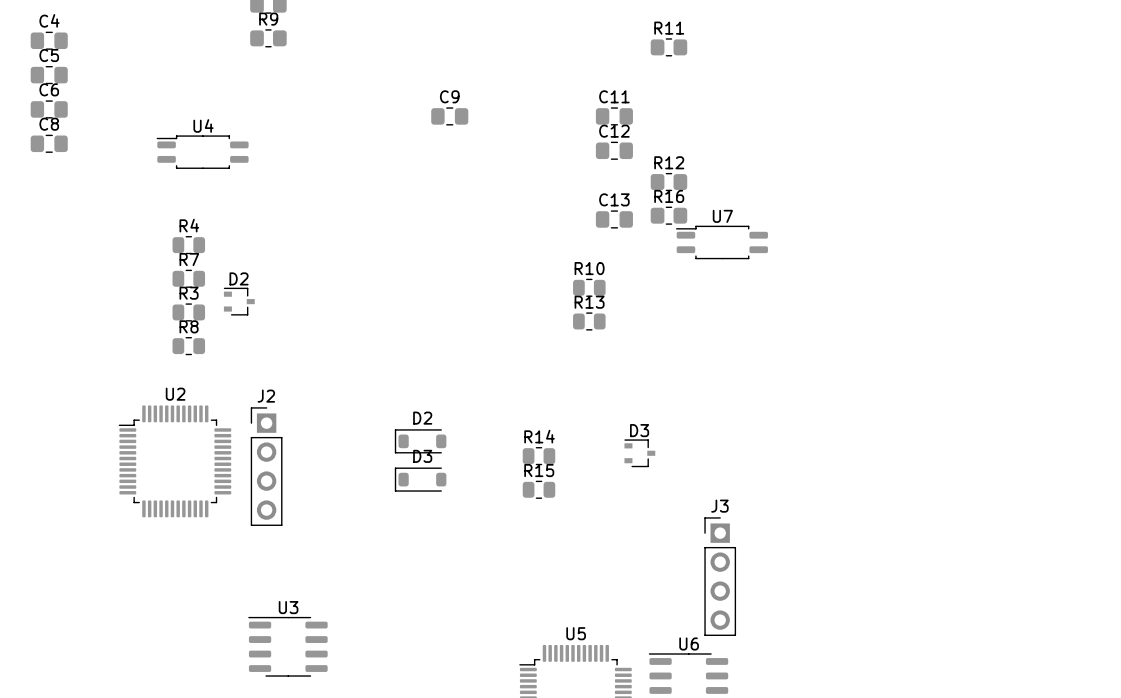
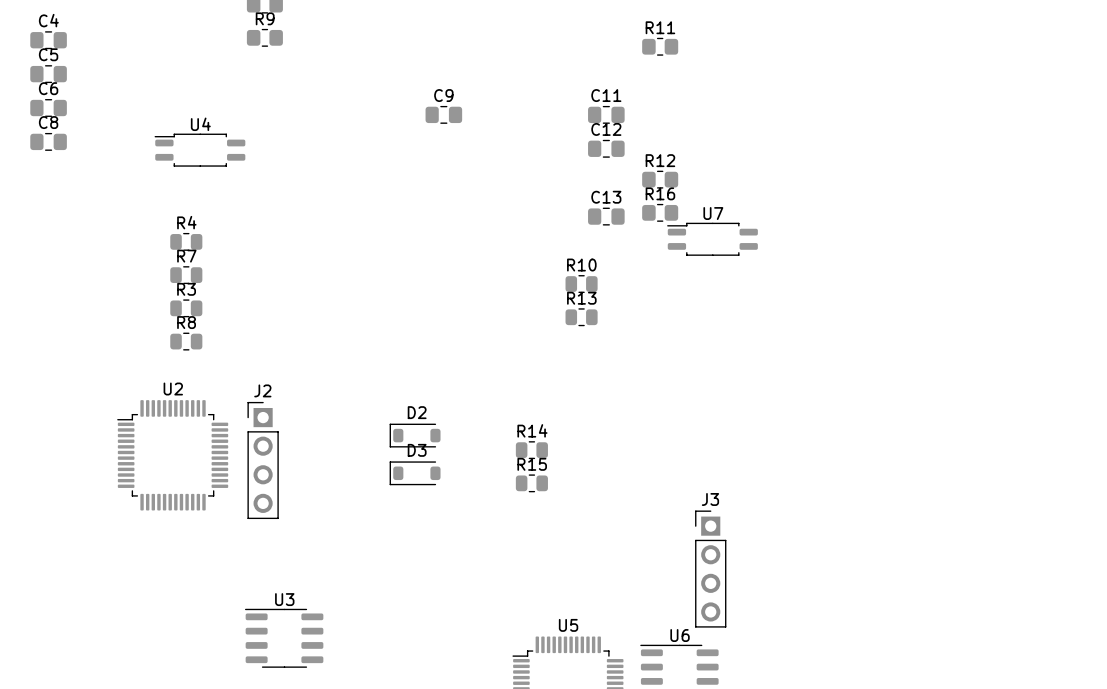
D2: (239, 301) -> none
D3: (639, 453) -> none

